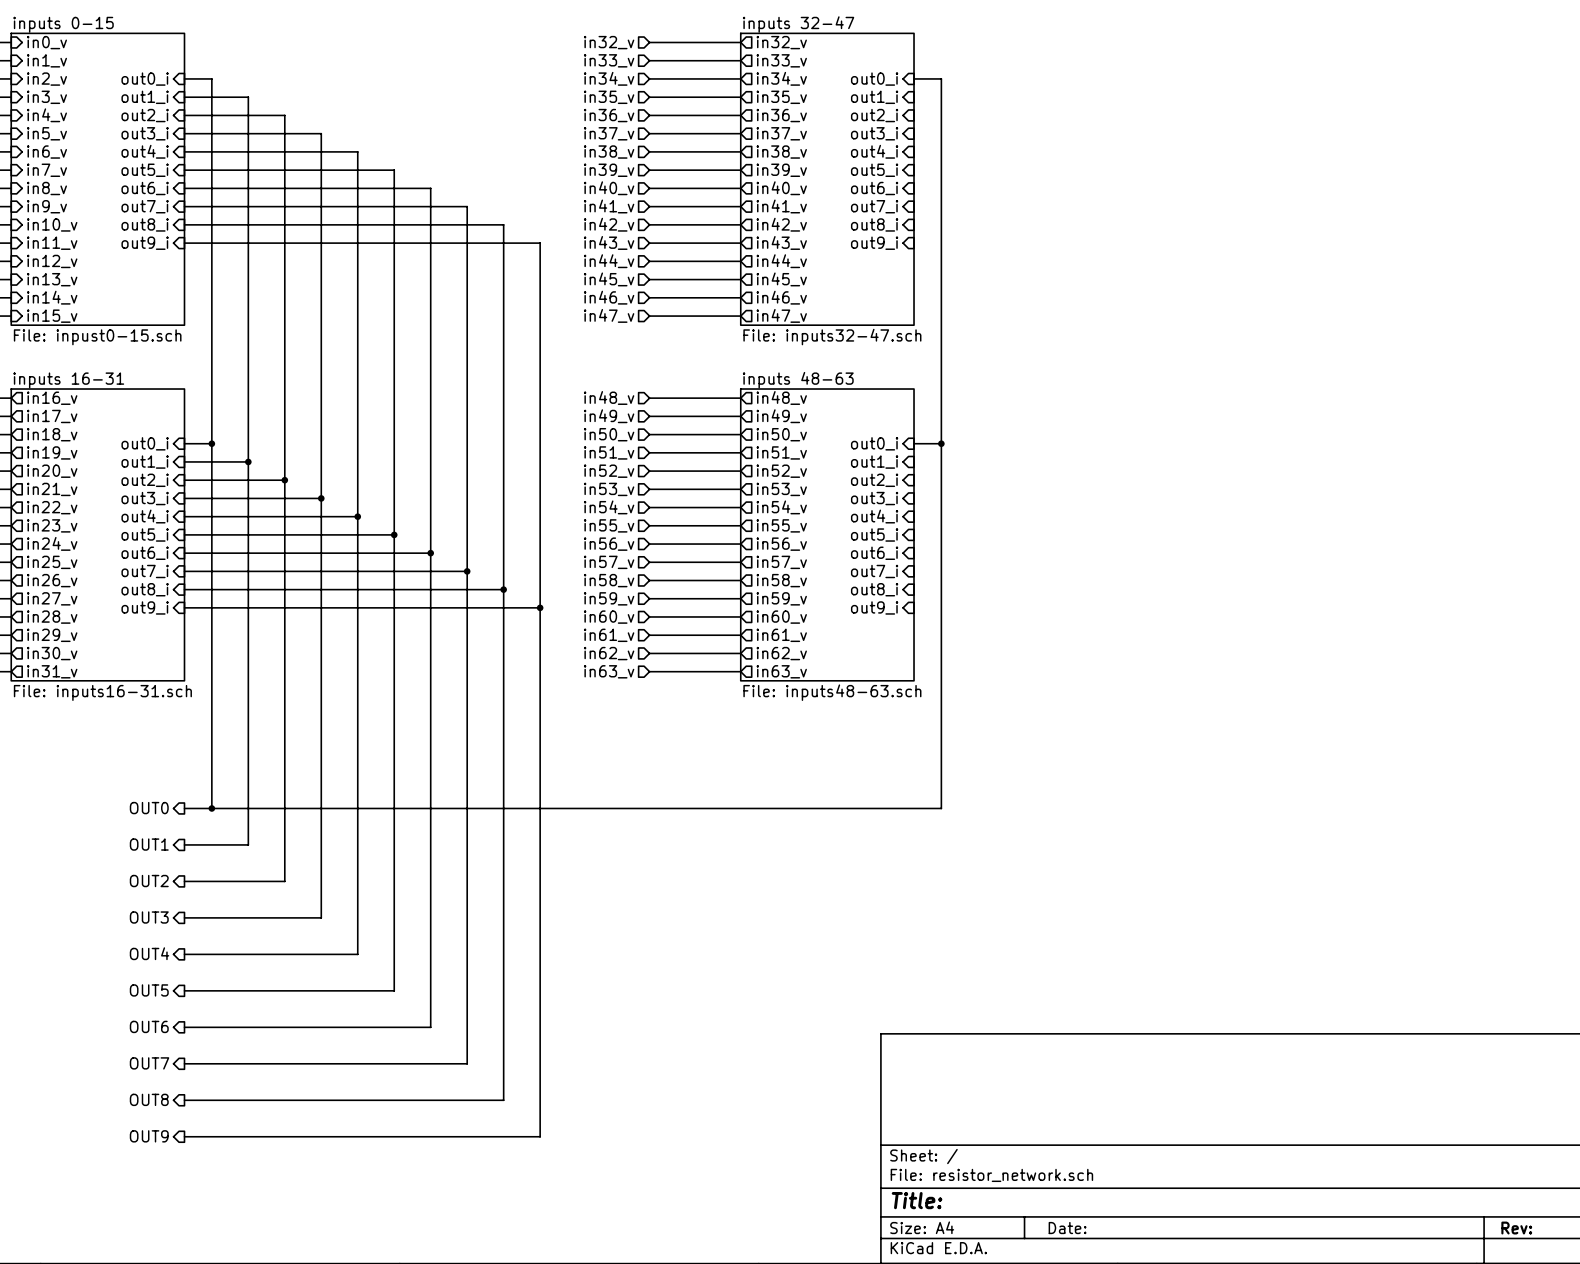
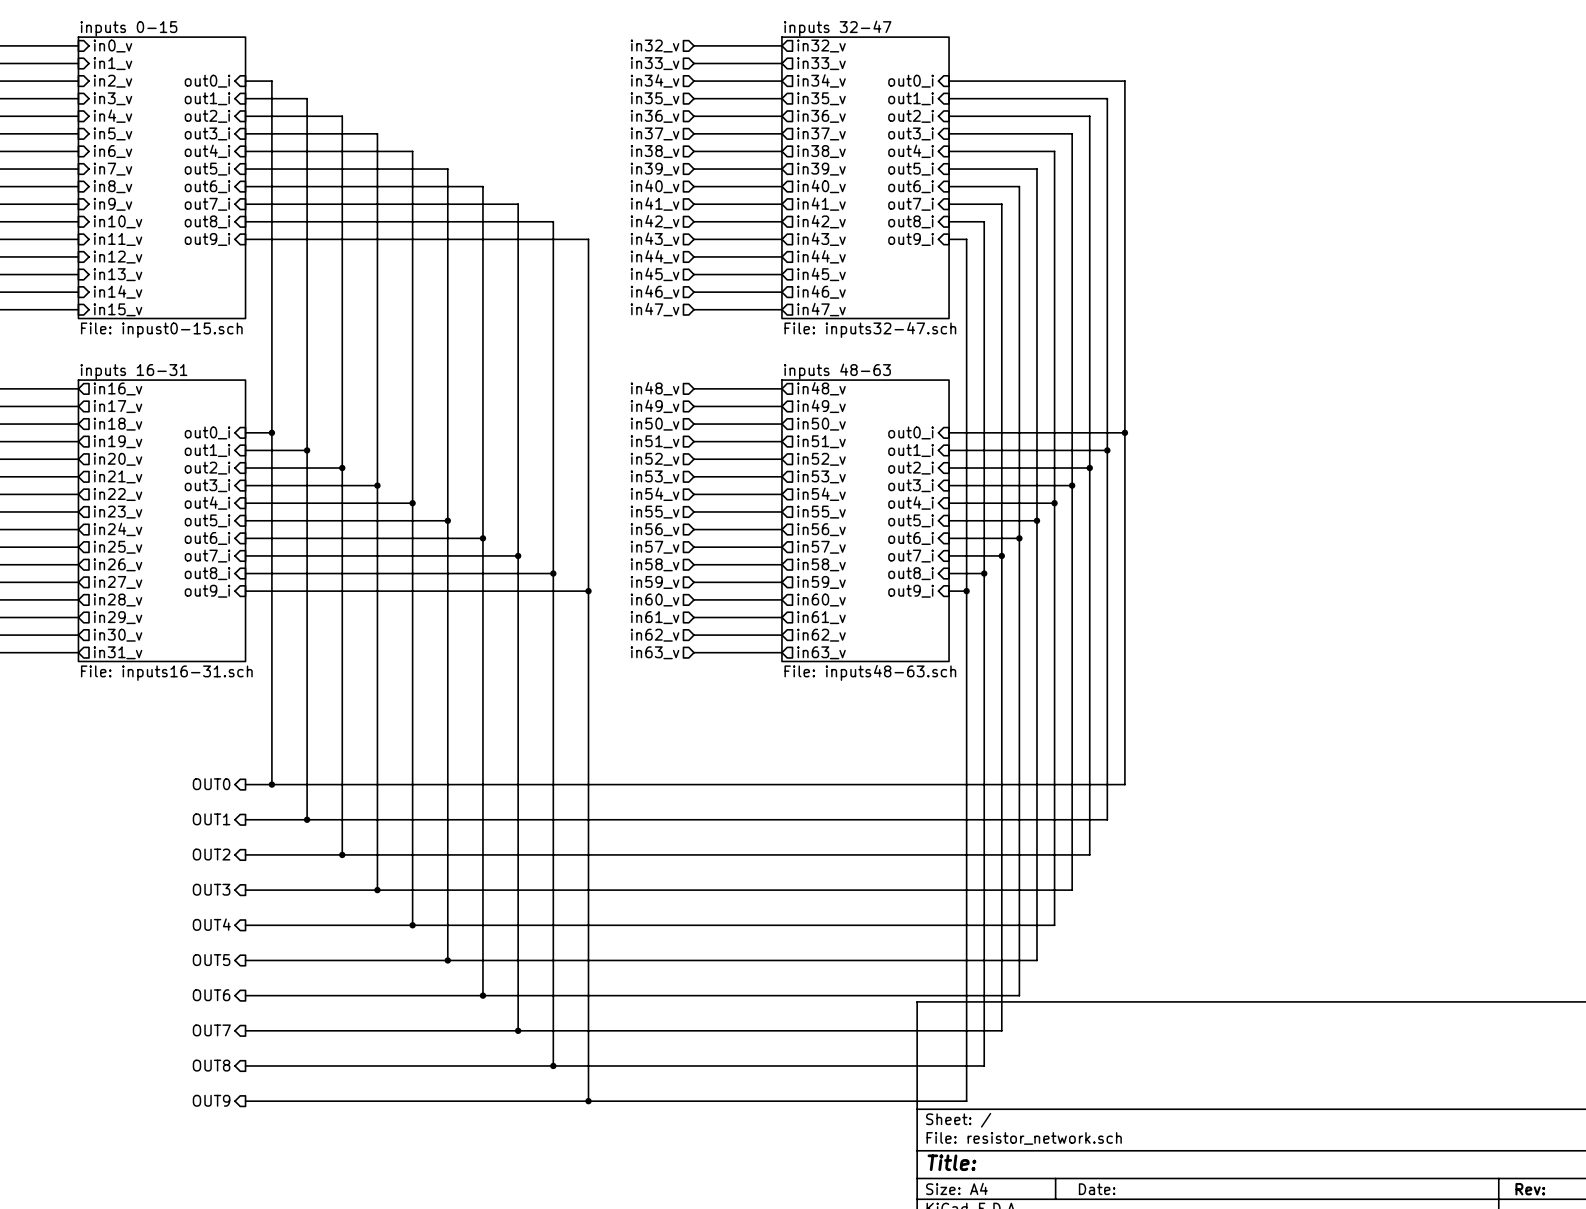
wire: (941, 78) (941, 808) -> (975, 81) (1124, 81) (1124, 784) (975, 784)
wire: none -> (949, 98) (1107, 98) (1107, 819) (307, 819)
wire: none -> (949, 116) (1089, 116) (1089, 854) (342, 854)
wire: none -> (949, 133) (1072, 133) (1072, 890) (377, 890)
wire: none -> (949, 151) (1054, 151) (1054, 925) (412, 925)
wire: none -> (949, 169) (1036, 169) (1036, 960) (447, 960)
wire: none -> (949, 186) (1019, 186) (1019, 995) (482, 995)
wire: none -> (949, 204) (1001, 204) (1001, 1030) (518, 1030)
wire: none -> (949, 221) (984, 221) (984, 1065) (553, 1065)
wire: none -> (949, 239) (966, 239) (966, 1101) (588, 1101)
wire: none -> (975, 432) (1124, 432)
junction: (941, 443) -> none
junction: none -> (1124, 432)
wire: none -> (949, 450) (1107, 450)
junction: none -> (1107, 450)
wire: none -> (949, 468) (1089, 468)
junction: none -> (1089, 468)
wire: none -> (949, 485) (1072, 485)
junction: none -> (1072, 485)
wire: none -> (949, 503) (1054, 503)
junction: none -> (1054, 503)
wire: none -> (949, 520) (1036, 520)
junction: none -> (1036, 520)
wire: none -> (949, 538) (1019, 538)
junction: none -> (1019, 538)
wire: none -> (949, 555) (1001, 555)
junction: none -> (1001, 555)
wire: none -> (949, 573) (984, 573)
junction: none -> (984, 573)
wire: none -> (949, 591) (966, 591)
junction: none -> (966, 591)
junction: none -> (307, 819)
junction: none -> (342, 854)
junction: none -> (377, 890)
junction: none -> (412, 925)
junction: none -> (447, 960)
junction: none -> (482, 995)
junction: none -> (518, 1030)
junction: none -> (553, 1065)
junction: none -> (588, 1101)

